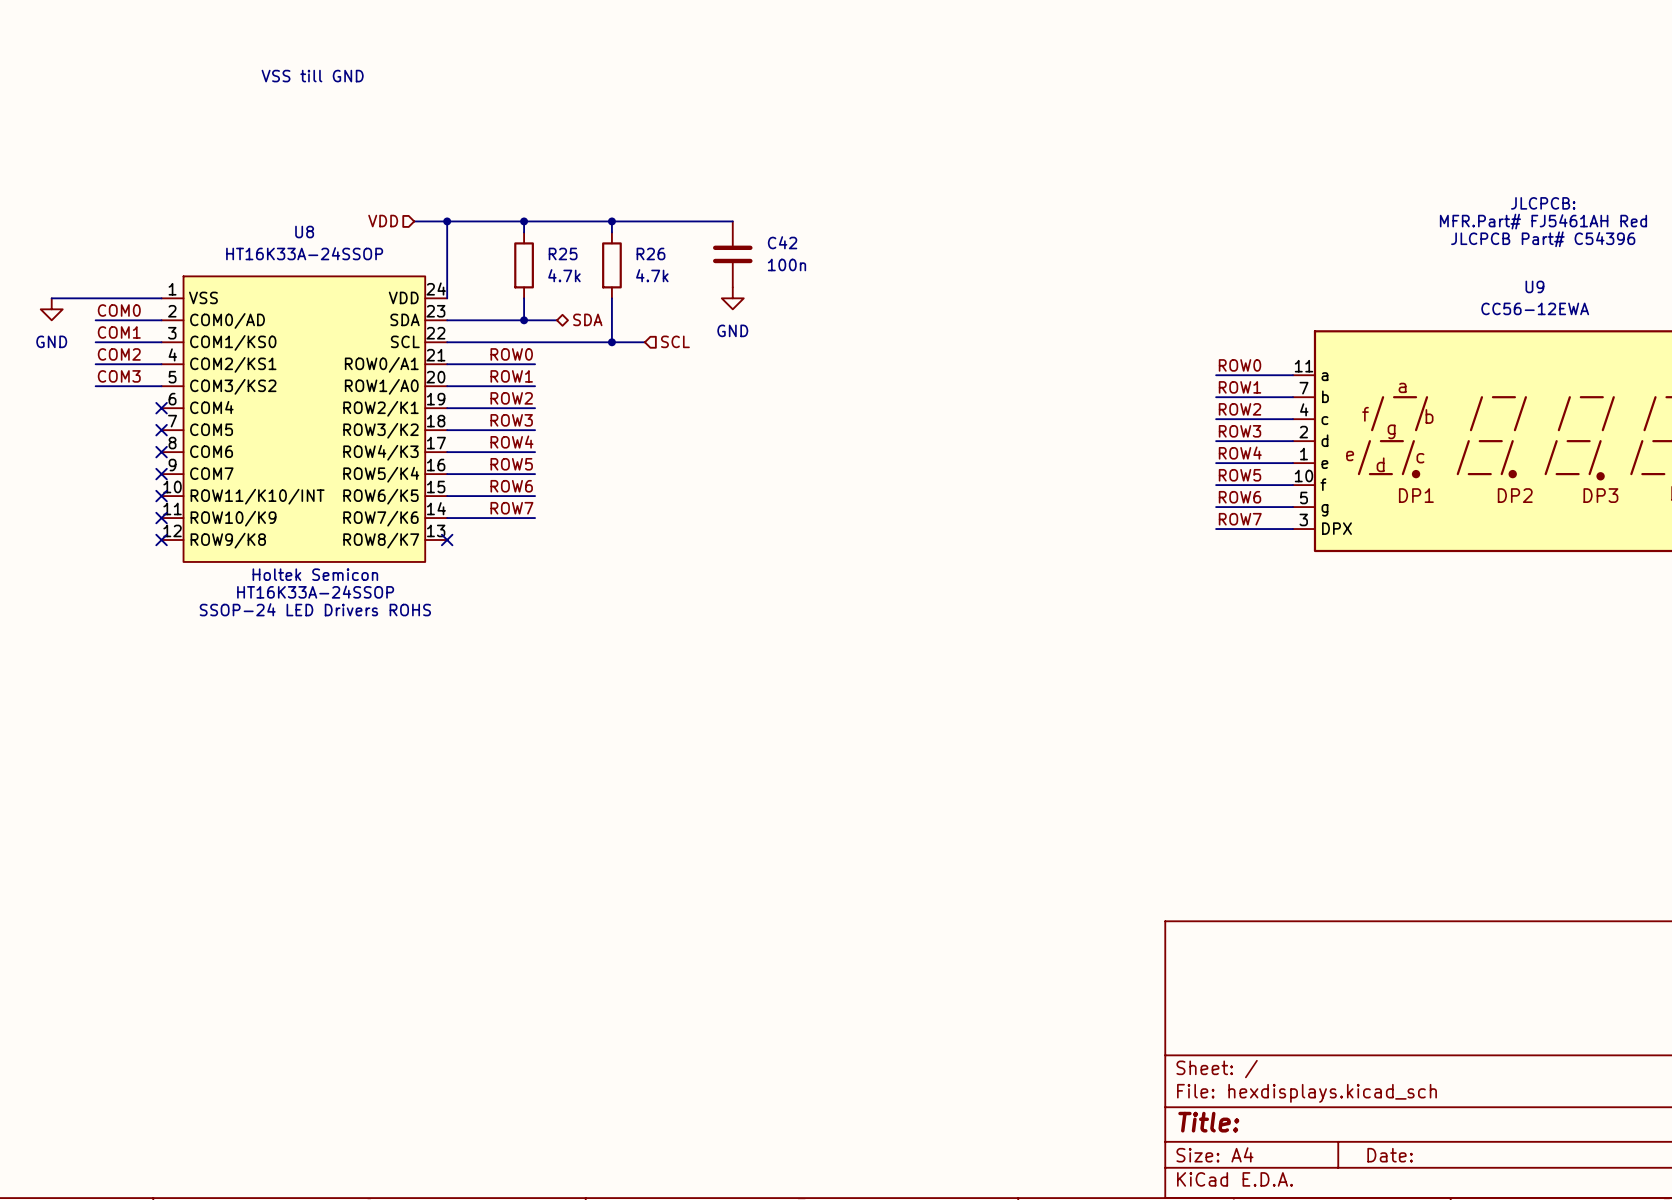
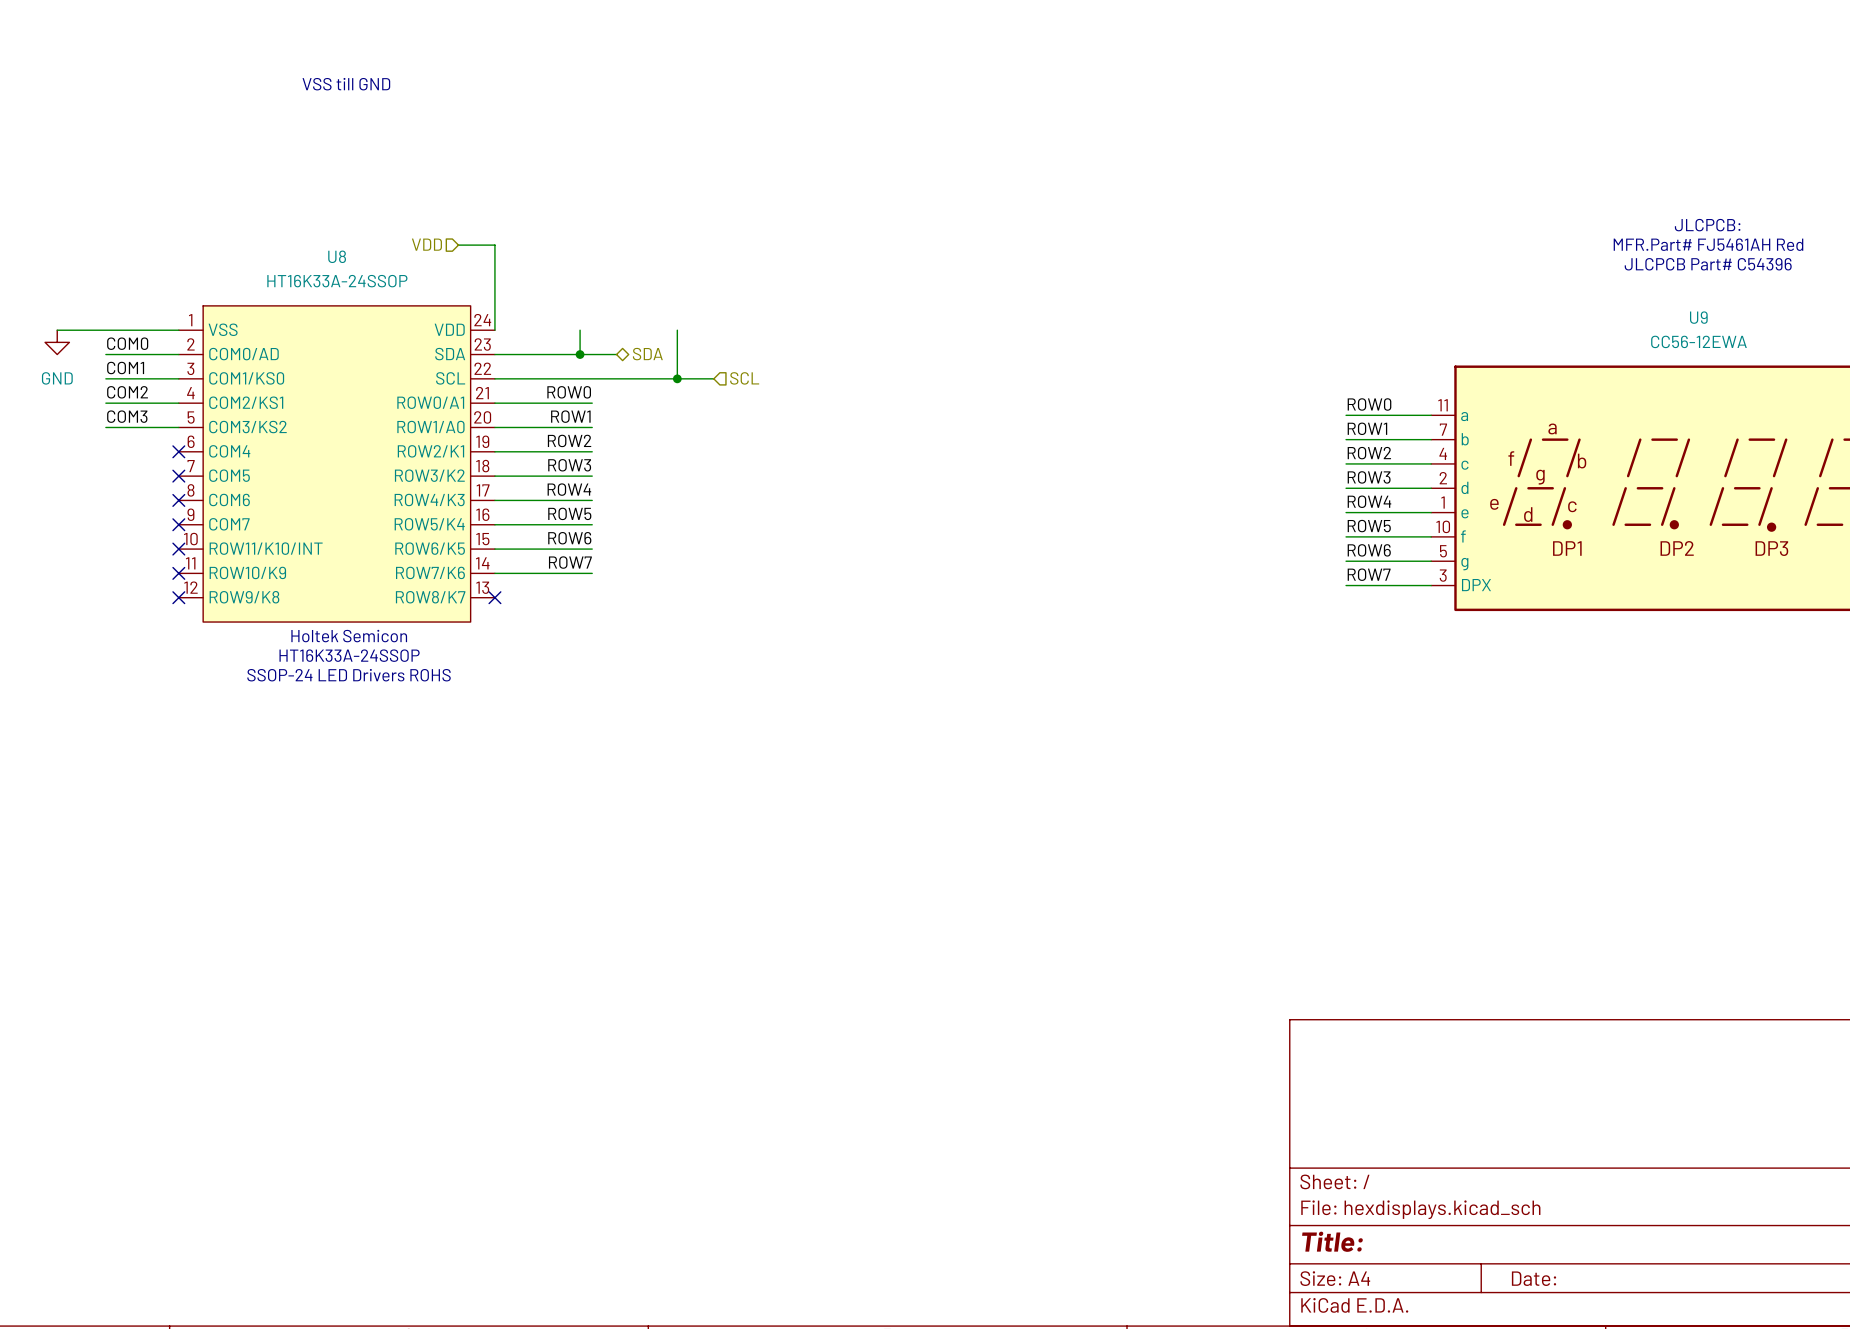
wire: (447, 221) (732, 221) -> none
junction: (447, 221) -> none
wire: (524, 221) (524, 232) -> none
junction: (524, 221) -> none
wire: (611, 221) (611, 232) -> none
junction: (611, 221) -> none
C42: 100n (732, 254) -> none
R25: 4.7k (524, 265) -> none
R26: 4.7k (611, 265) -> none
power symbol: GND (732, 298) -> none

